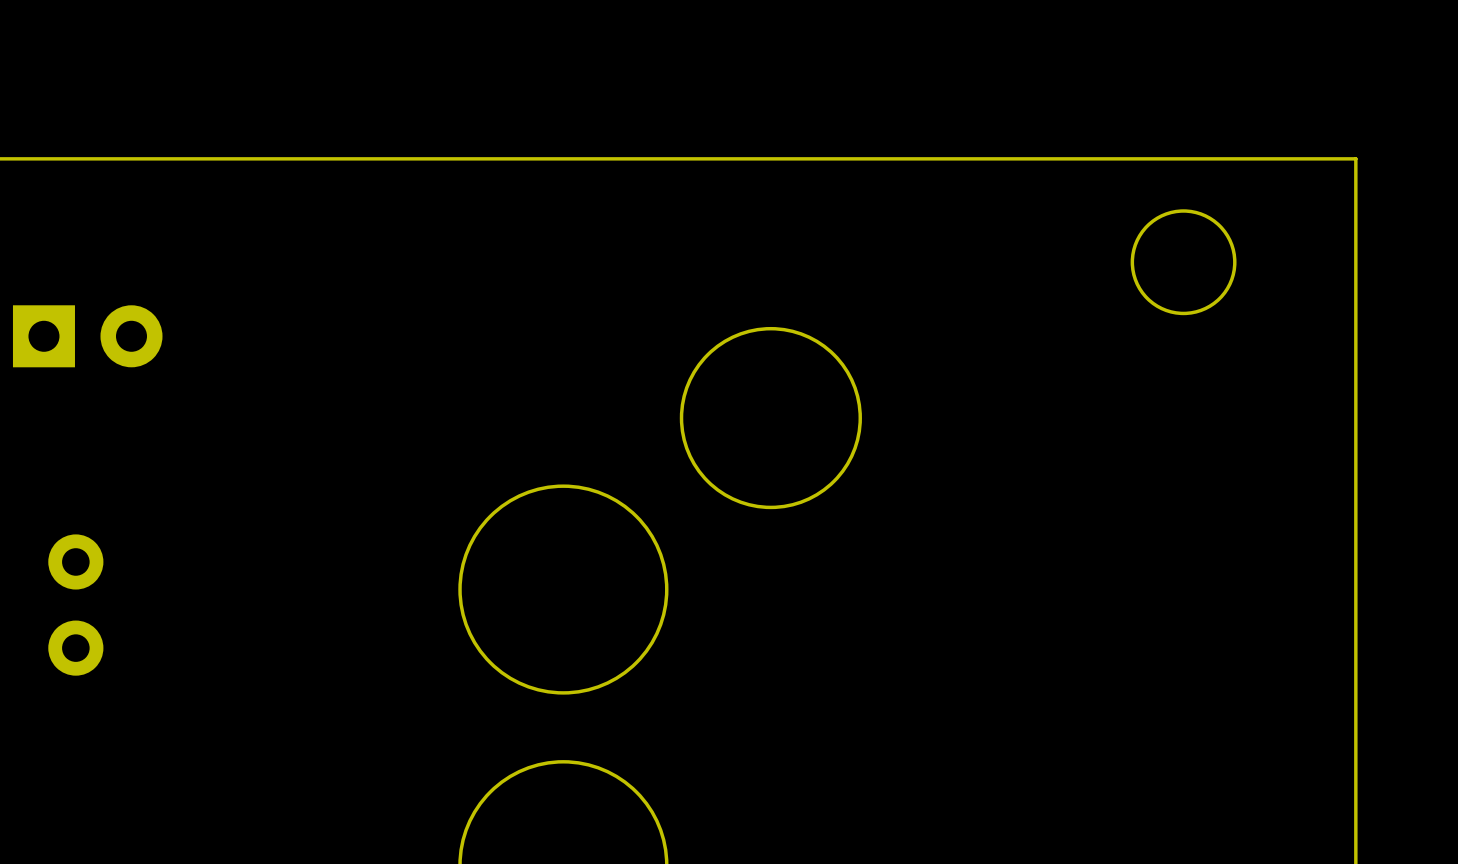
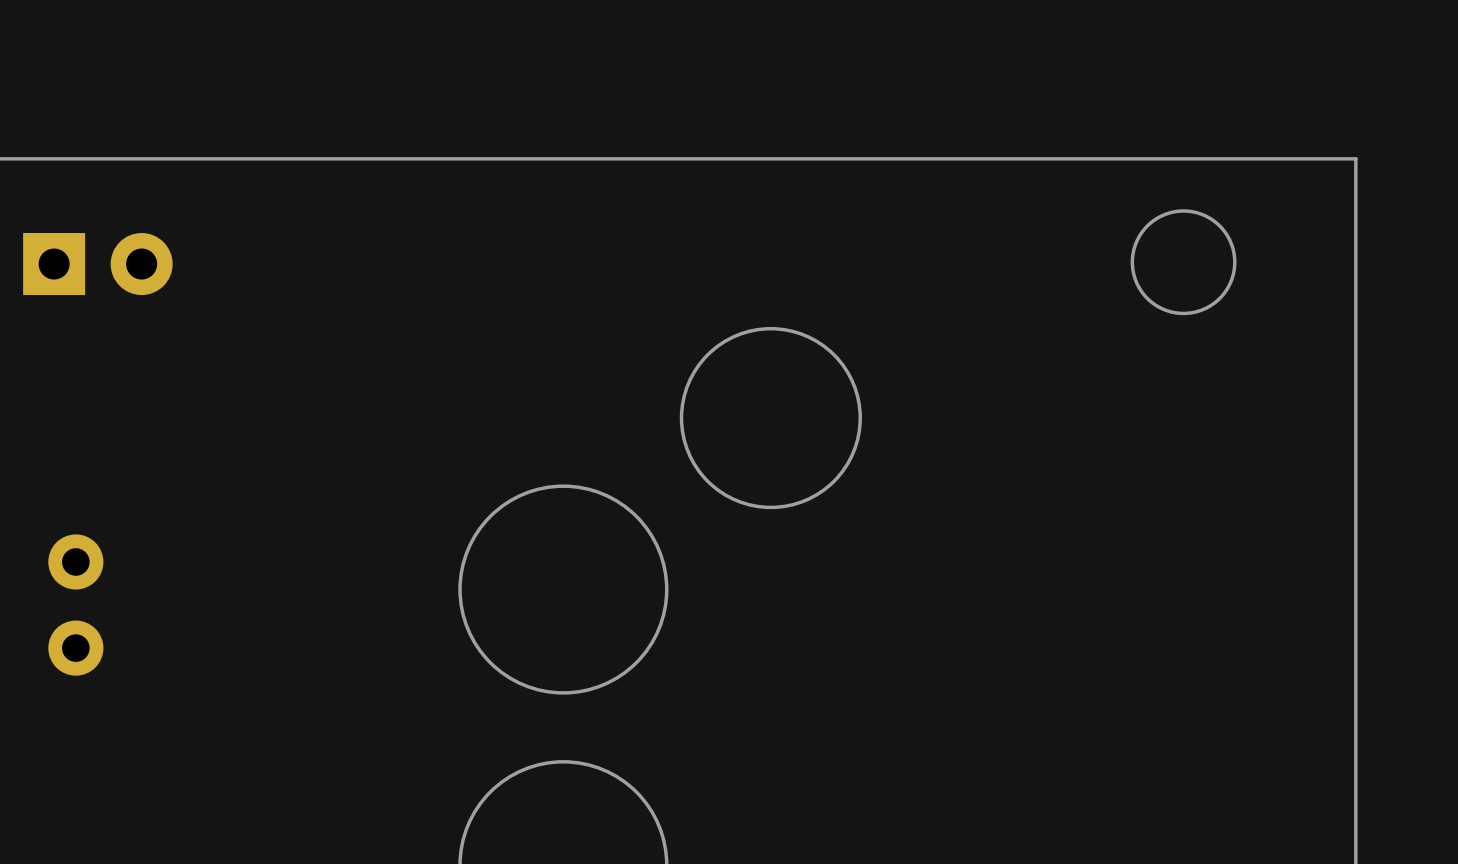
part position: (87, 336) -> (97, 264)

